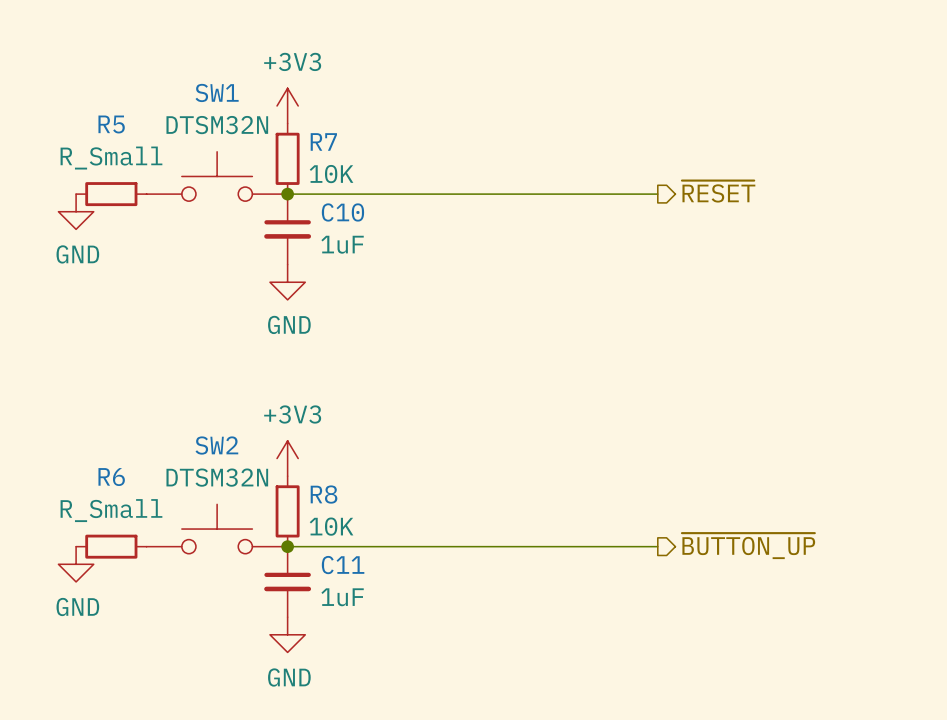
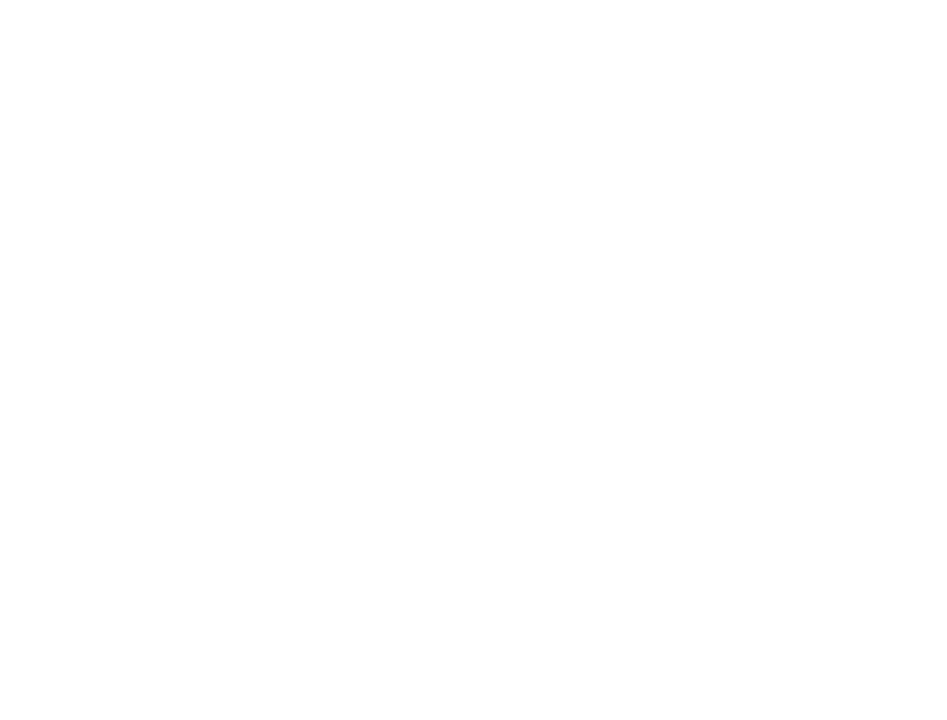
power symbol: +3V3 (287, 105) -> none
R7: 10K (287, 158) -> none
SW1: DTSM32N (217, 176) -> none
hierarchical label: ~{RESET} (718, 191) -> none
R5: R_Small (111, 194) -> none
wire: (287, 194) (657, 194) -> none
junction: (287, 194) -> none
power symbol: GND (76, 211) -> none
C10: 1uF (287, 229) -> none
power symbol: GND (287, 282) -> none
power symbol: +3V3 (287, 458) -> none
R8: 10K (287, 511) -> none
SW2: DTSM32N (217, 529) -> none
R6: R_Small (111, 546) -> none
wire: (287, 546) (657, 546) -> none
junction: (287, 546) -> none
hierarchical label: ~{BUTTON_UP} (748, 546) -> none
power symbol: GND (76, 564) -> none
C11: 1uF (287, 581) -> none
power symbol: GND (287, 634) -> none

